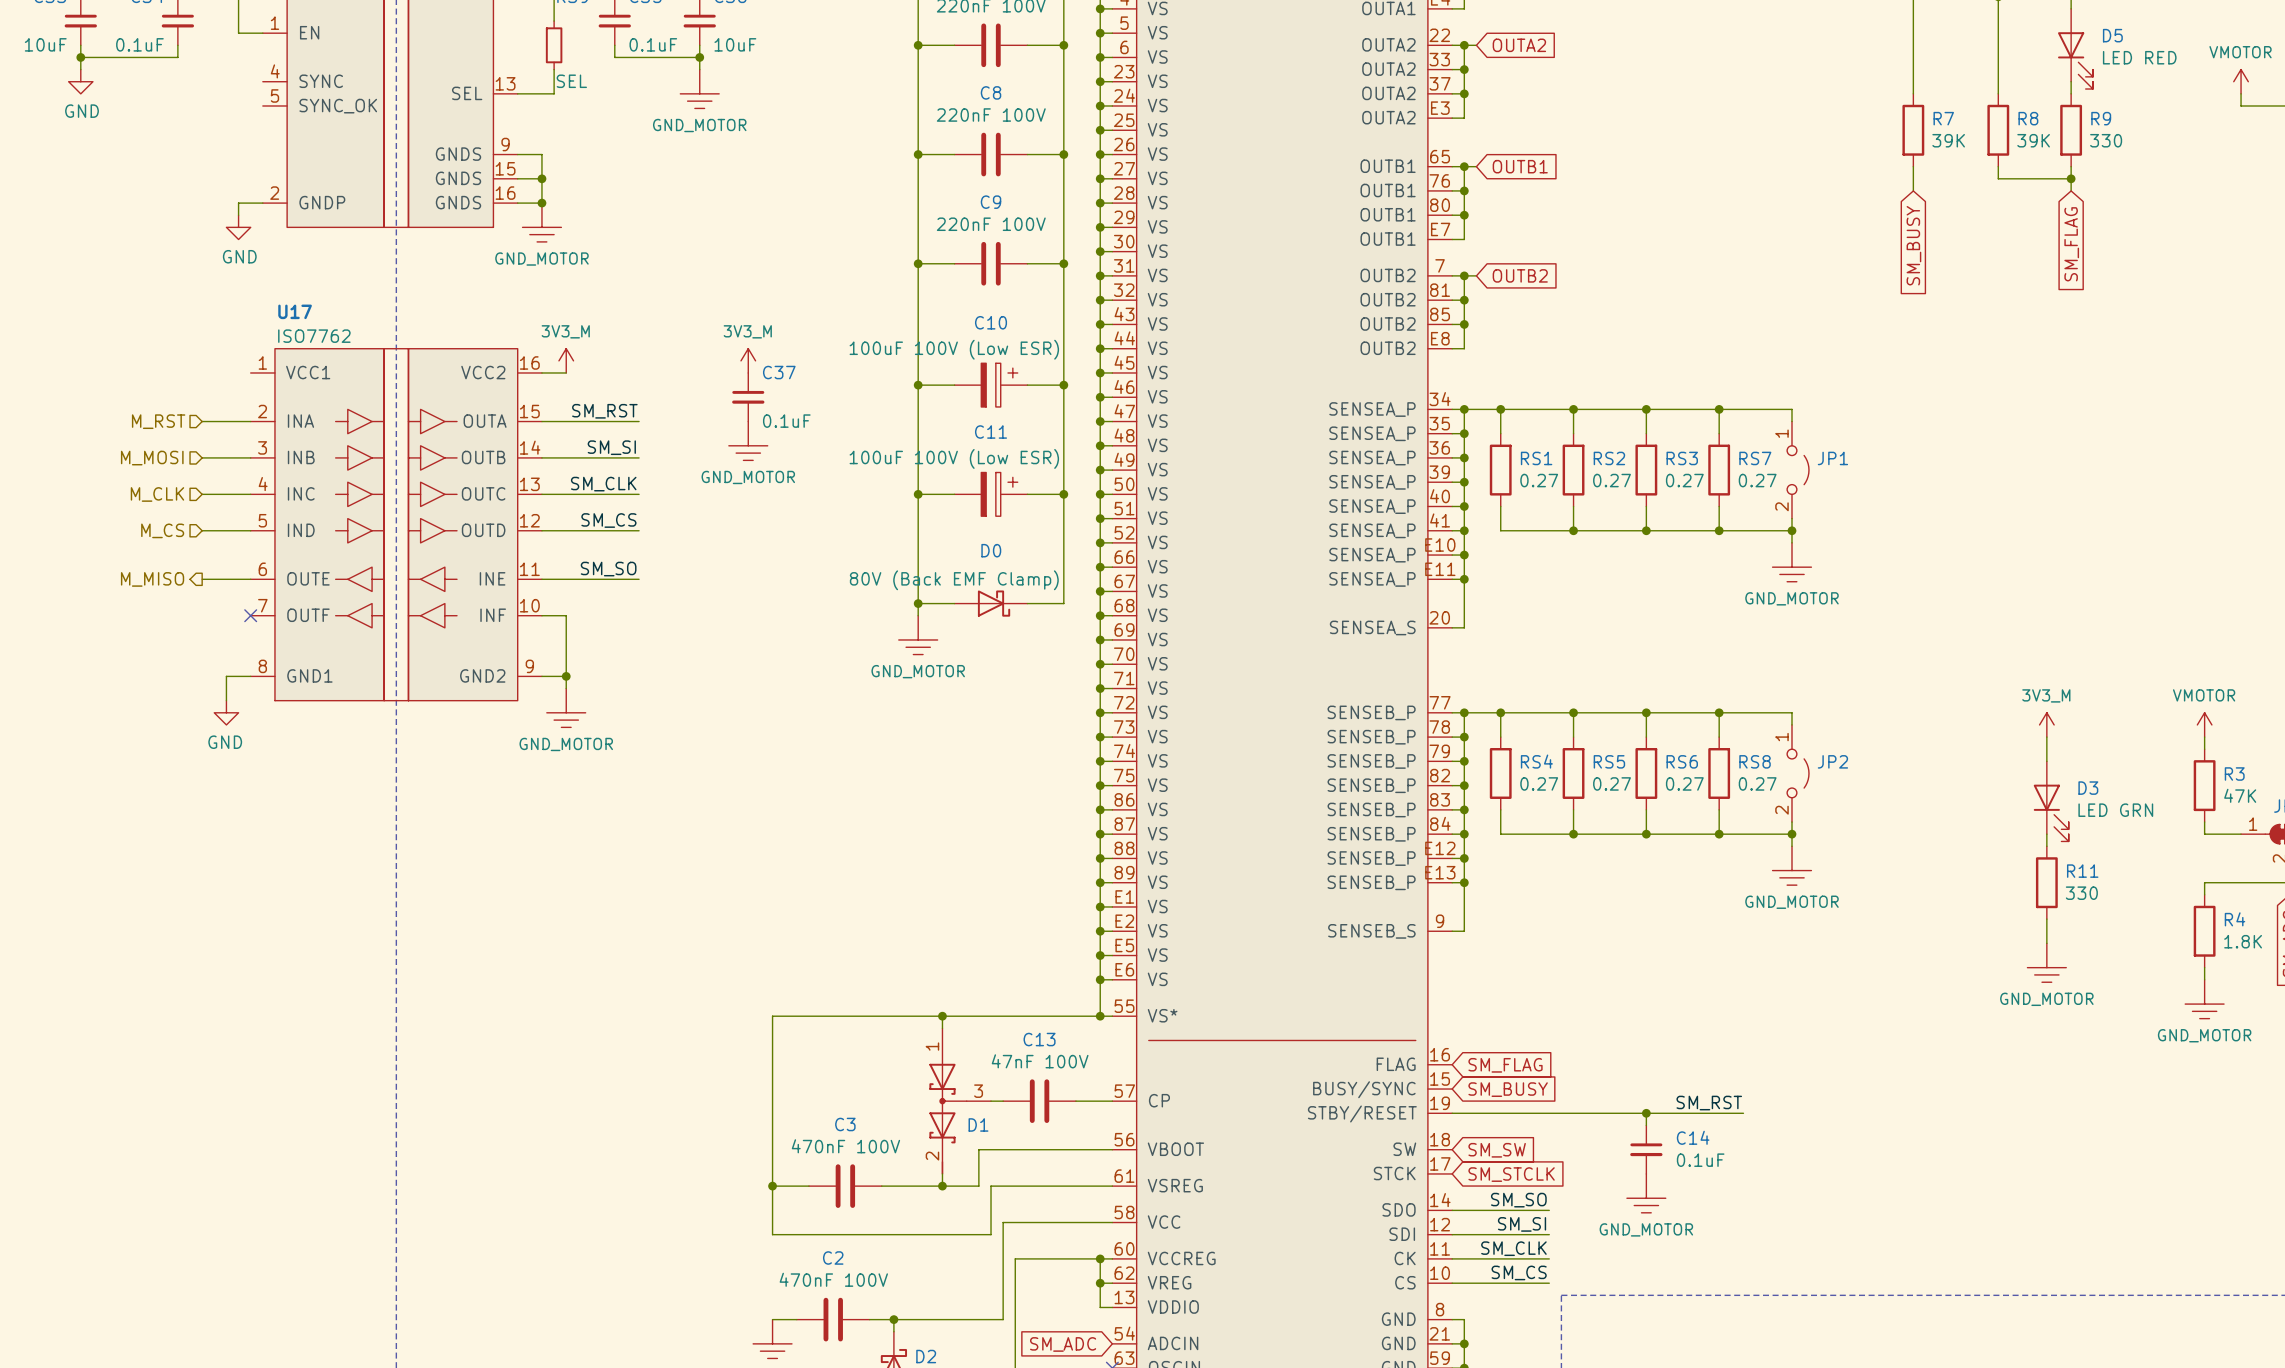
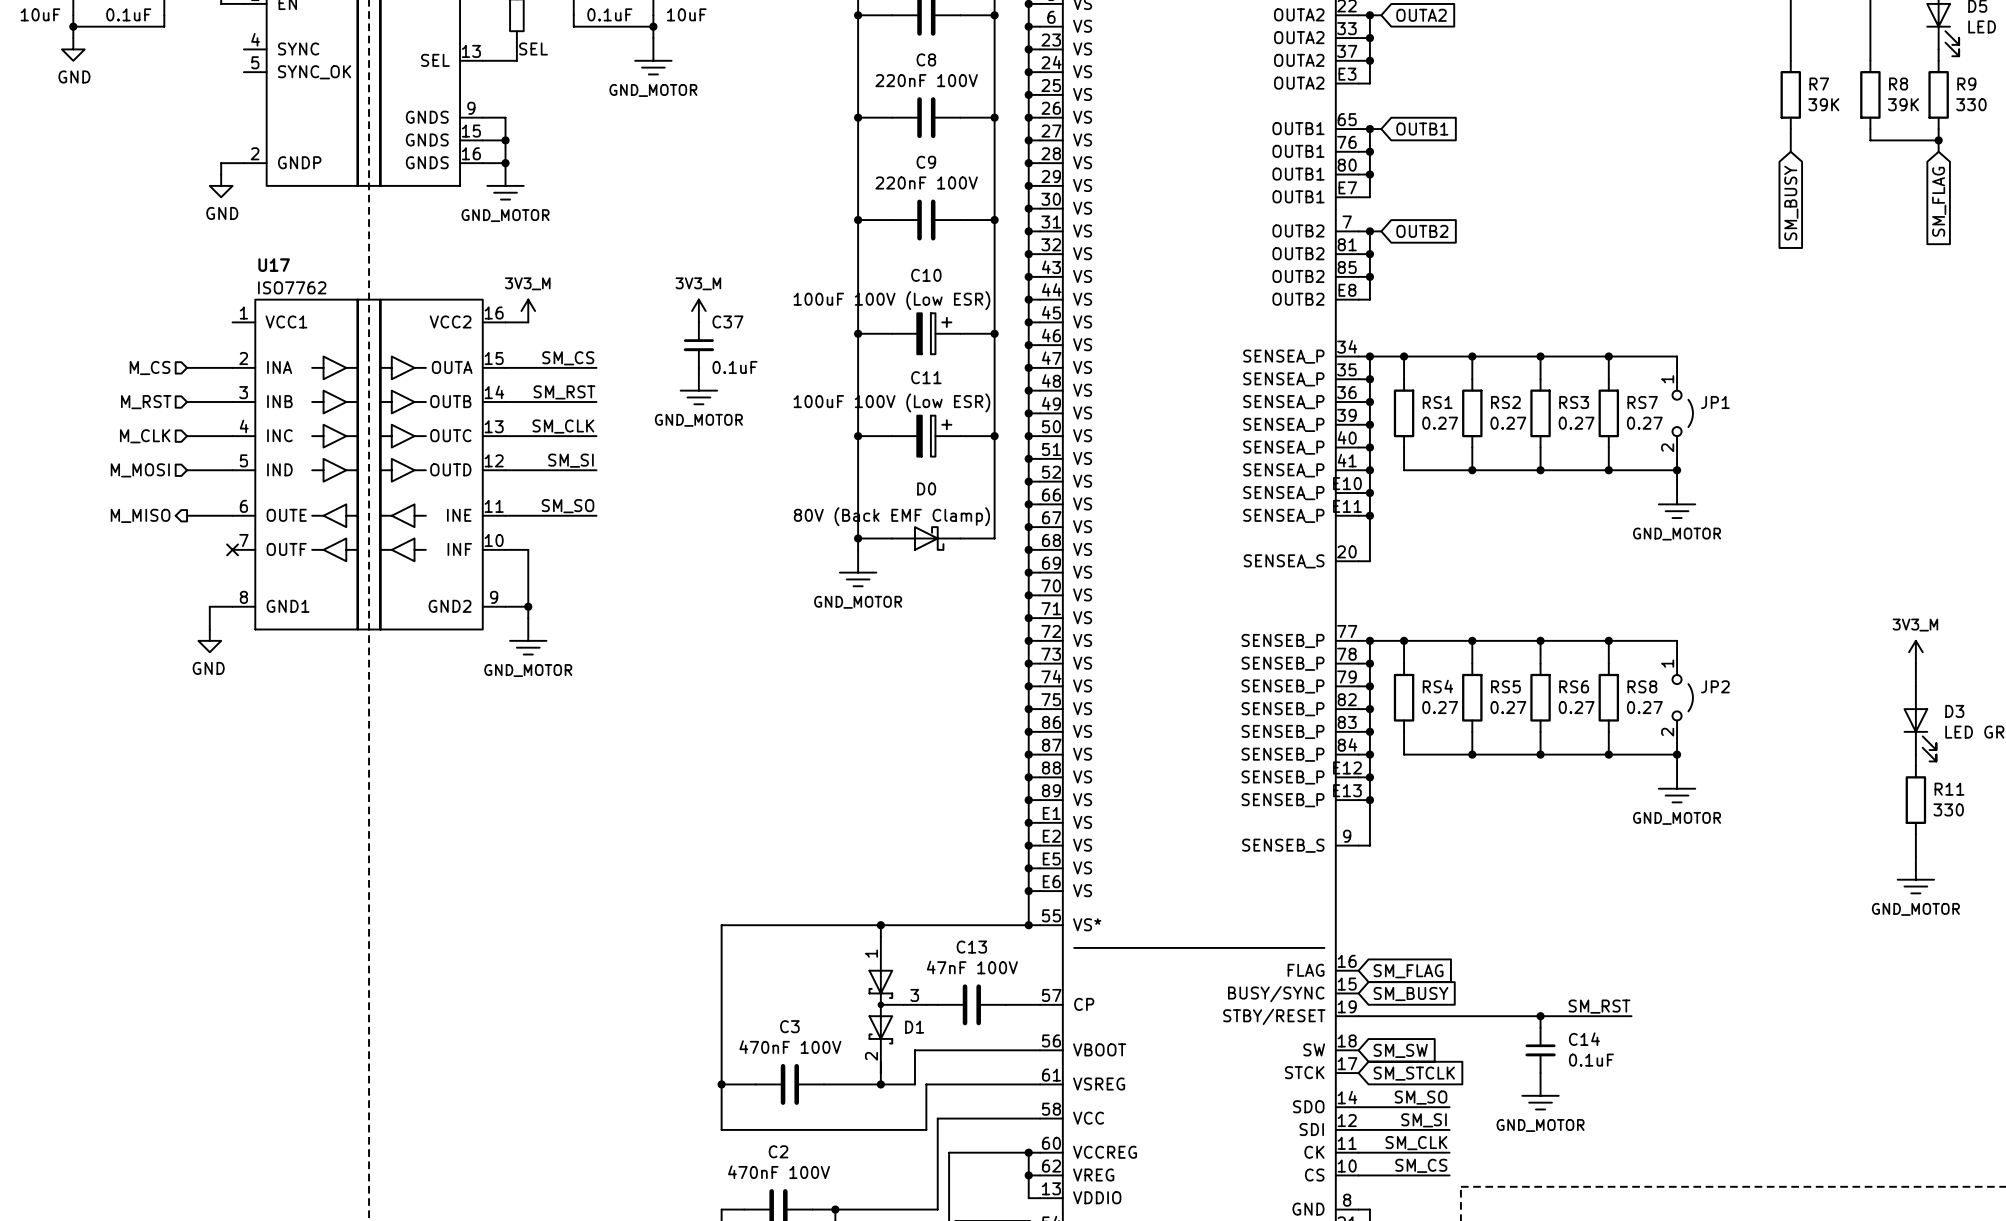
label: SM_RST (604, 411) -> SM_CS (568, 358)
hierarchical label: M_RST (158, 421) -> M_CS (150, 368)
label: SM_SI (611, 447) -> SM_RST (564, 392)
hierarchical label: M_MOSI (152, 458) -> M_RST (146, 402)
label: SM_CS (608, 520) -> SM_SI (570, 460)
hierarchical label: M_CS (162, 530) -> M_MOSI (140, 470)

